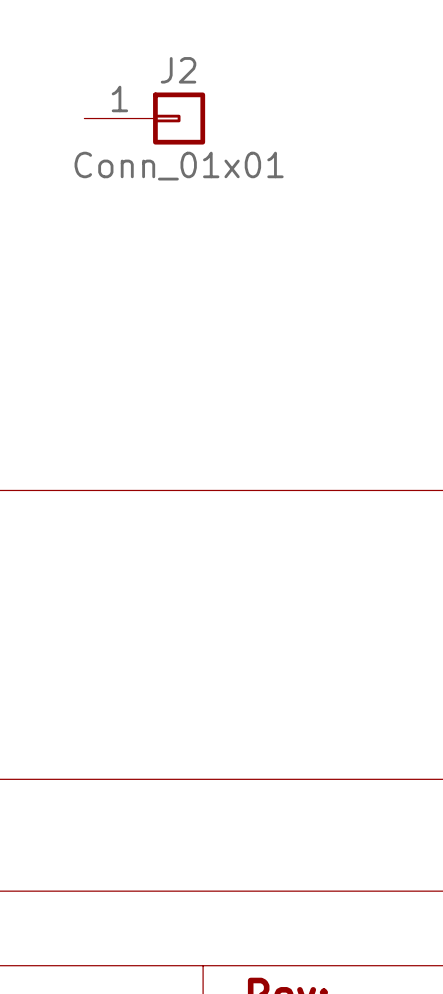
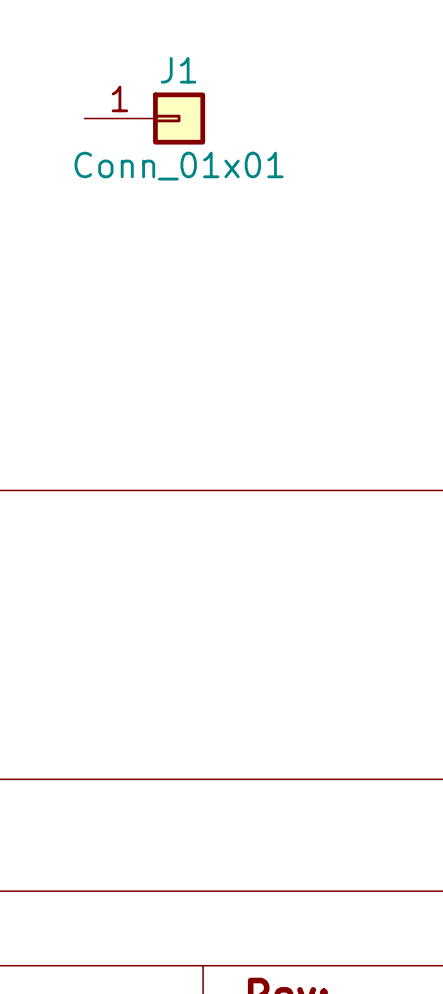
J2 name: J2 (178, 70) -> J1 (178, 70)

